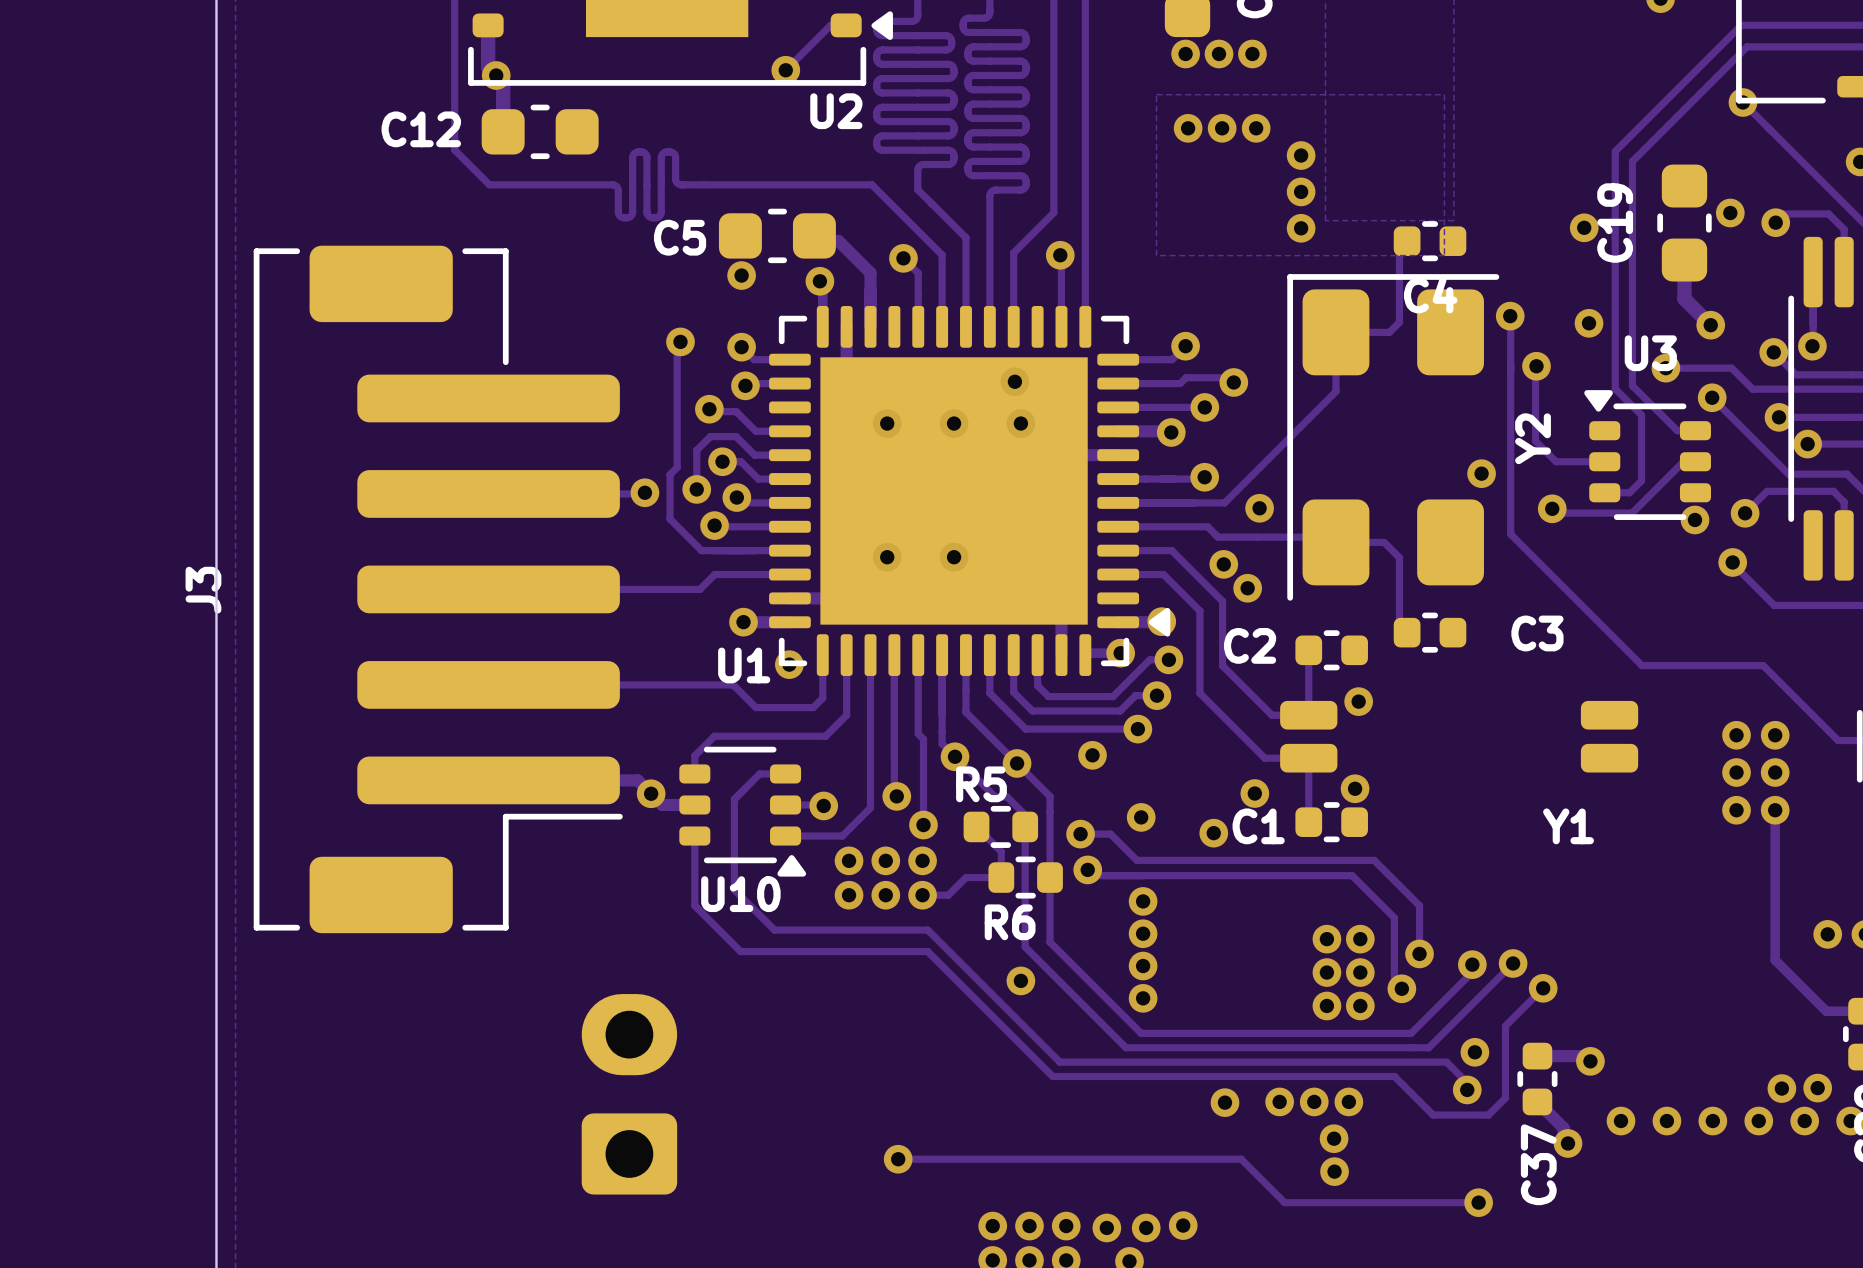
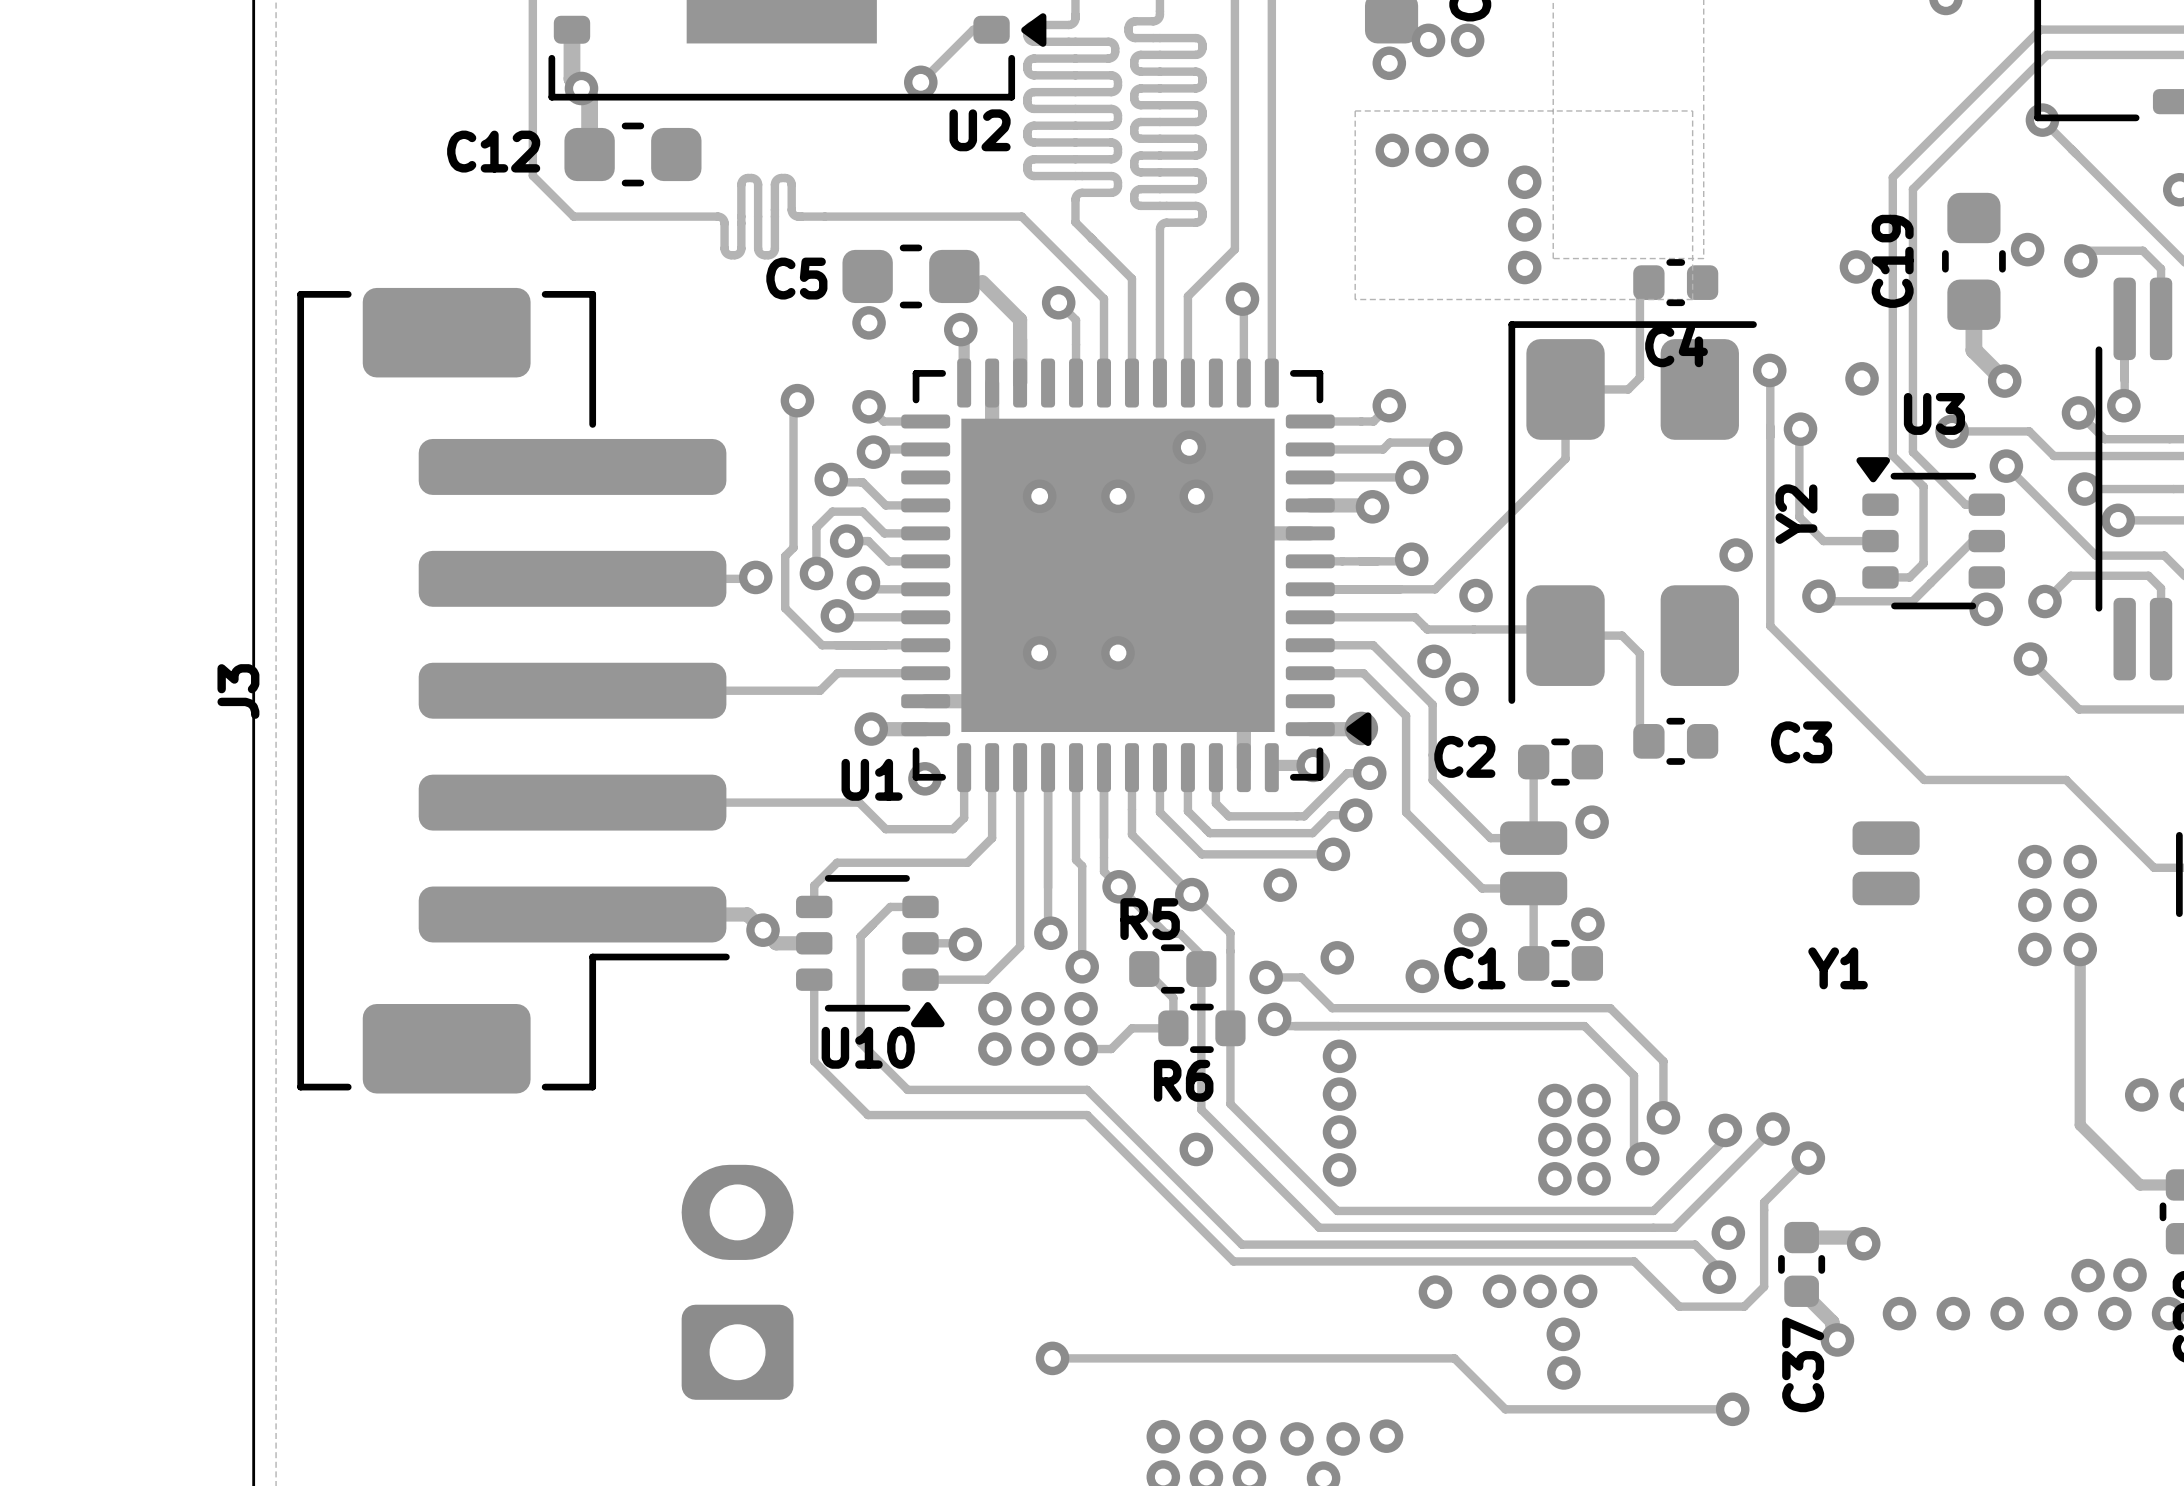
via position: (1219, 53) -> (1428, 40)
via position: (1252, 53) -> (1467, 40)

